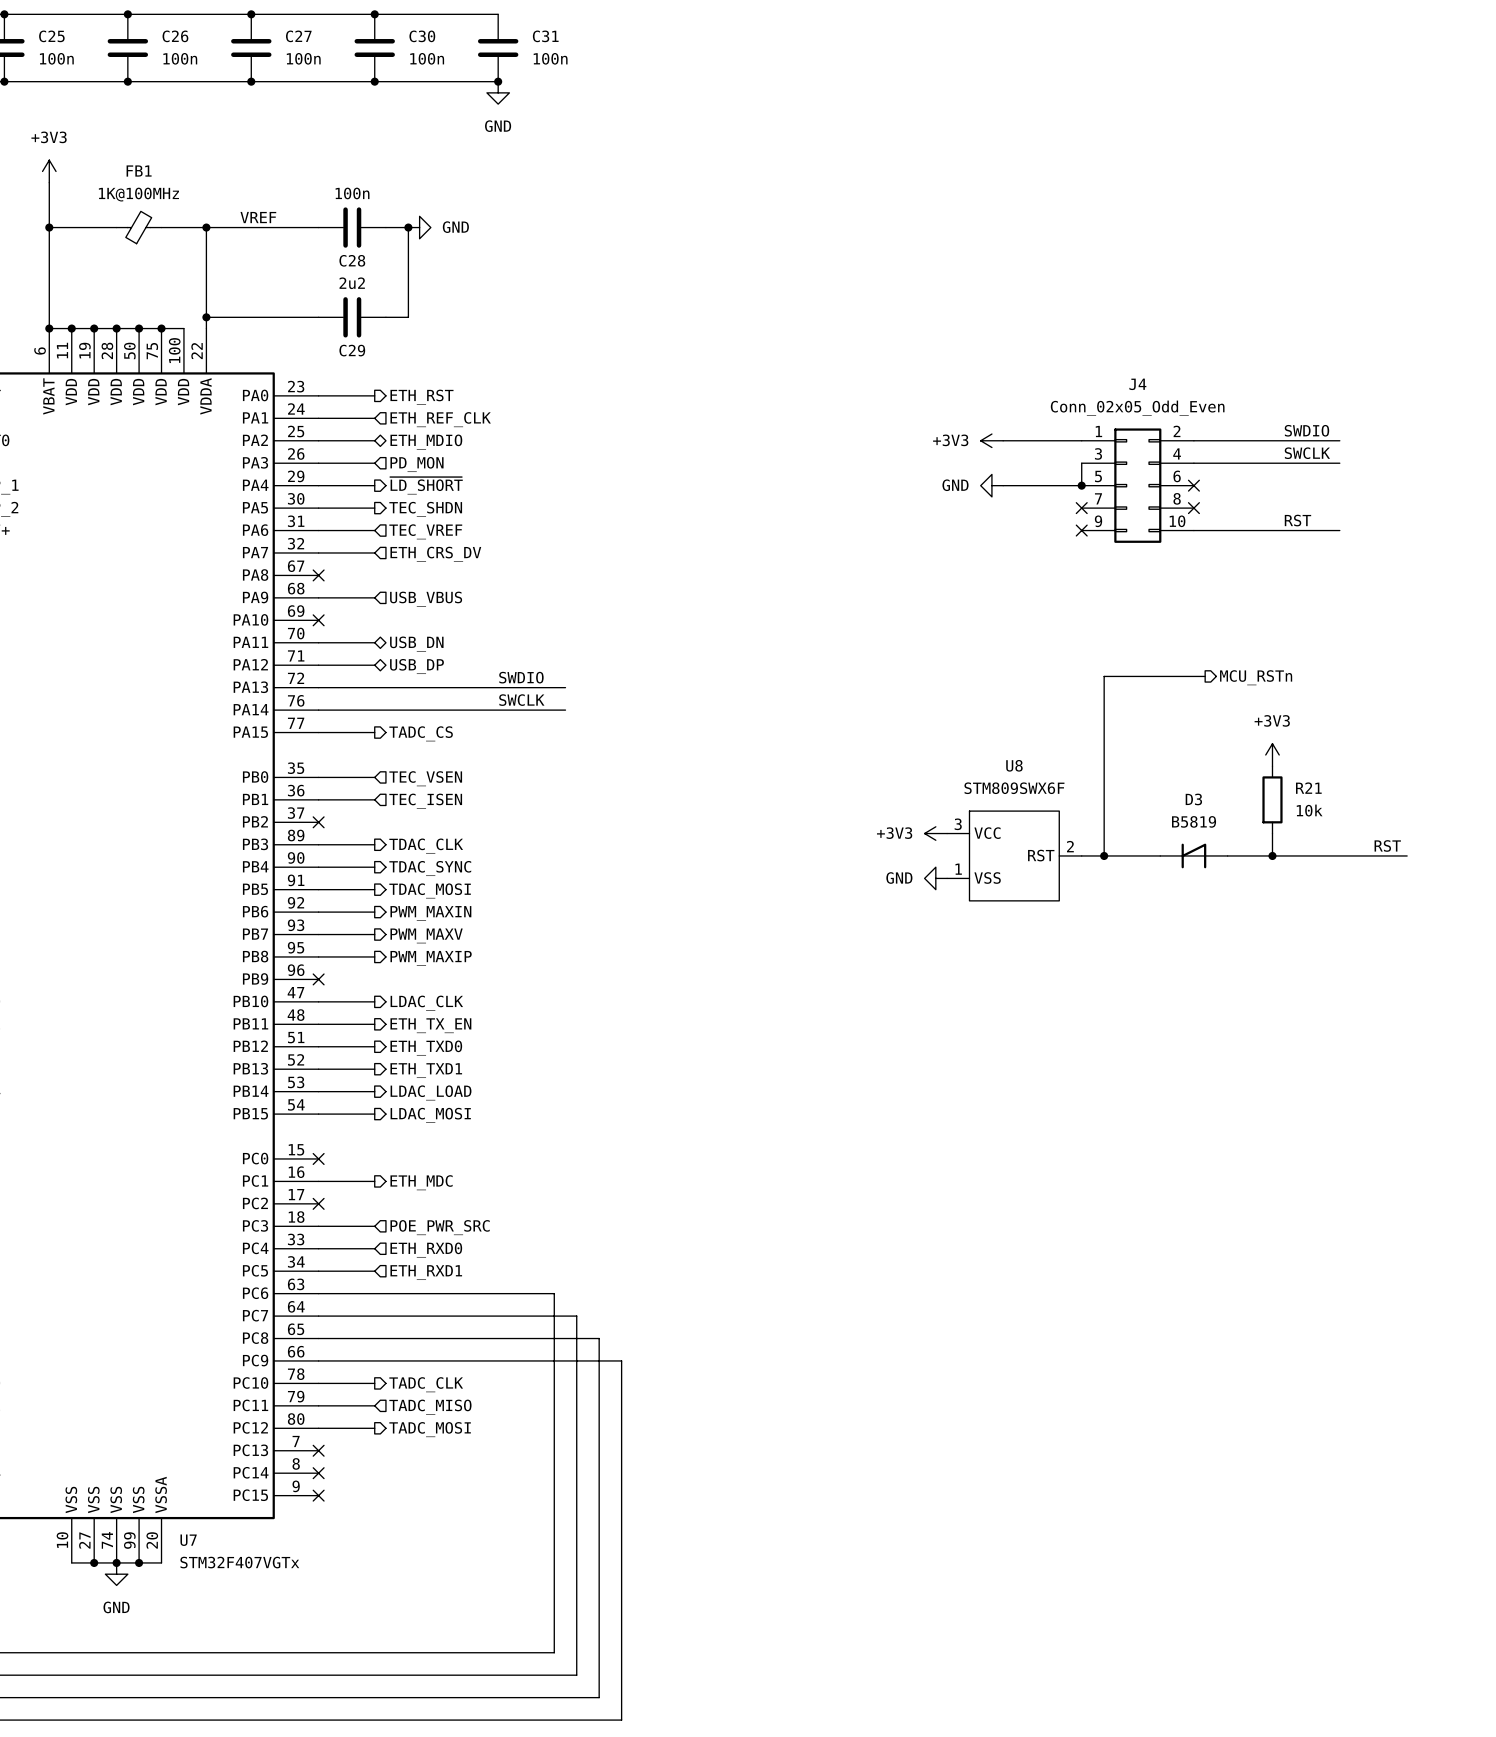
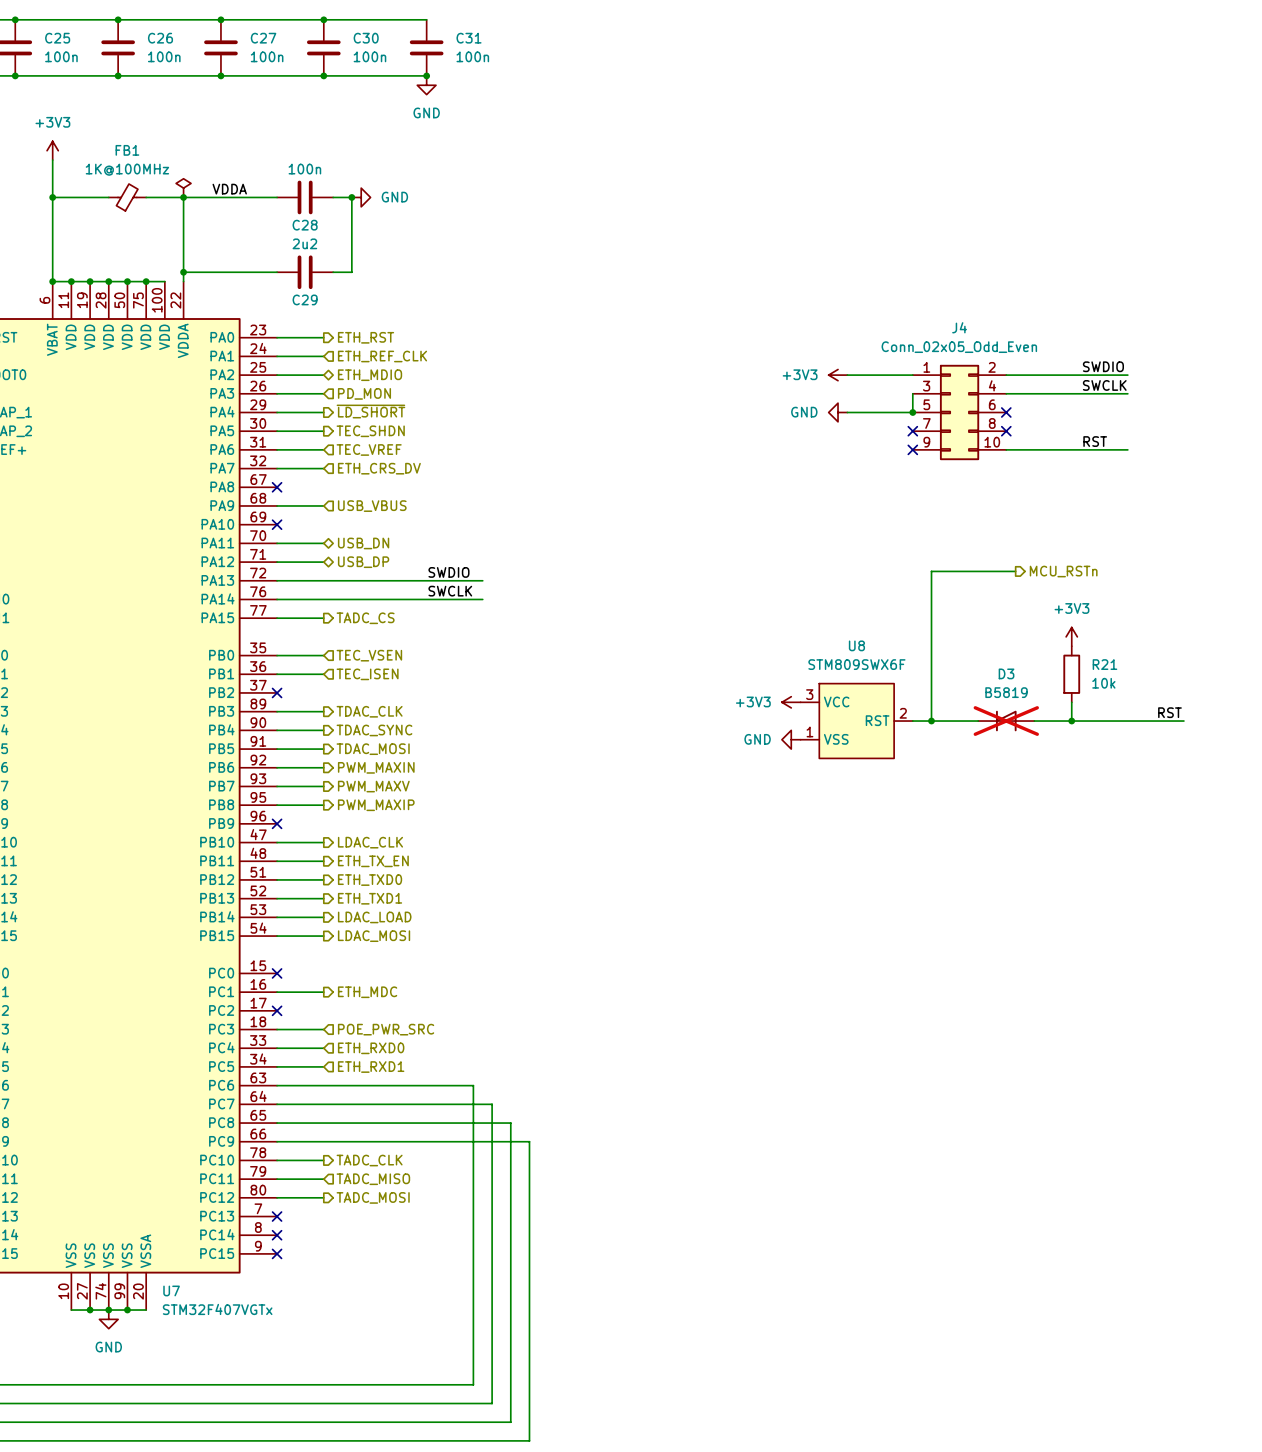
power symbol: none -> (183, 188)
label: VREF (258, 217) -> VDDA (229, 189)
D3 do-not-place cross: none -> (1006, 721)

